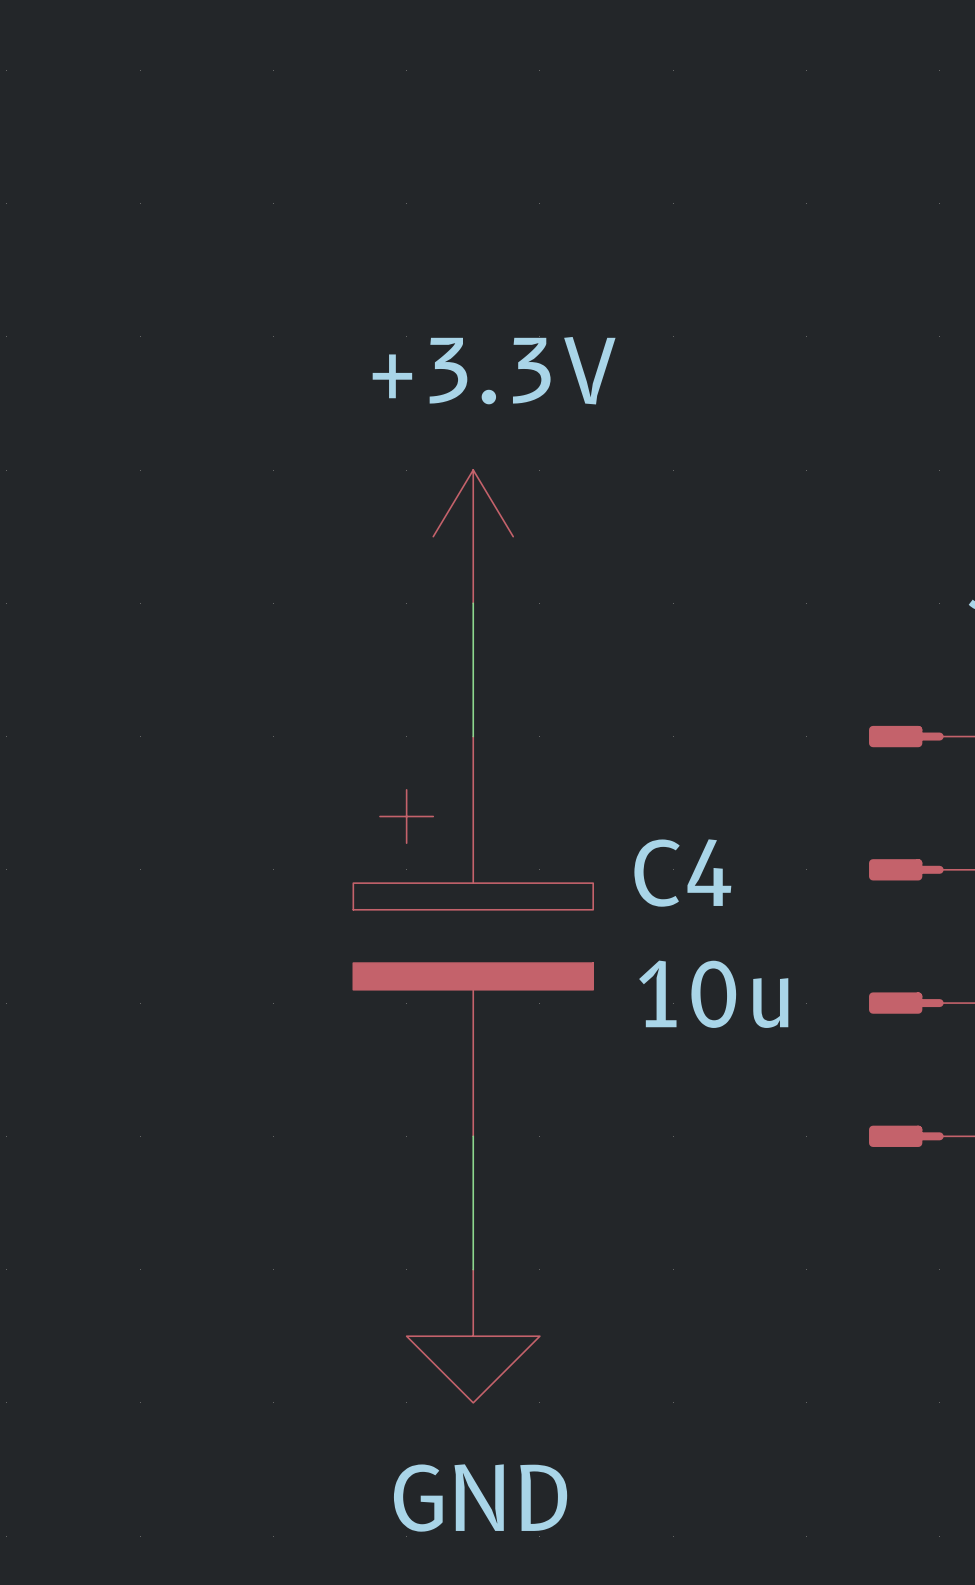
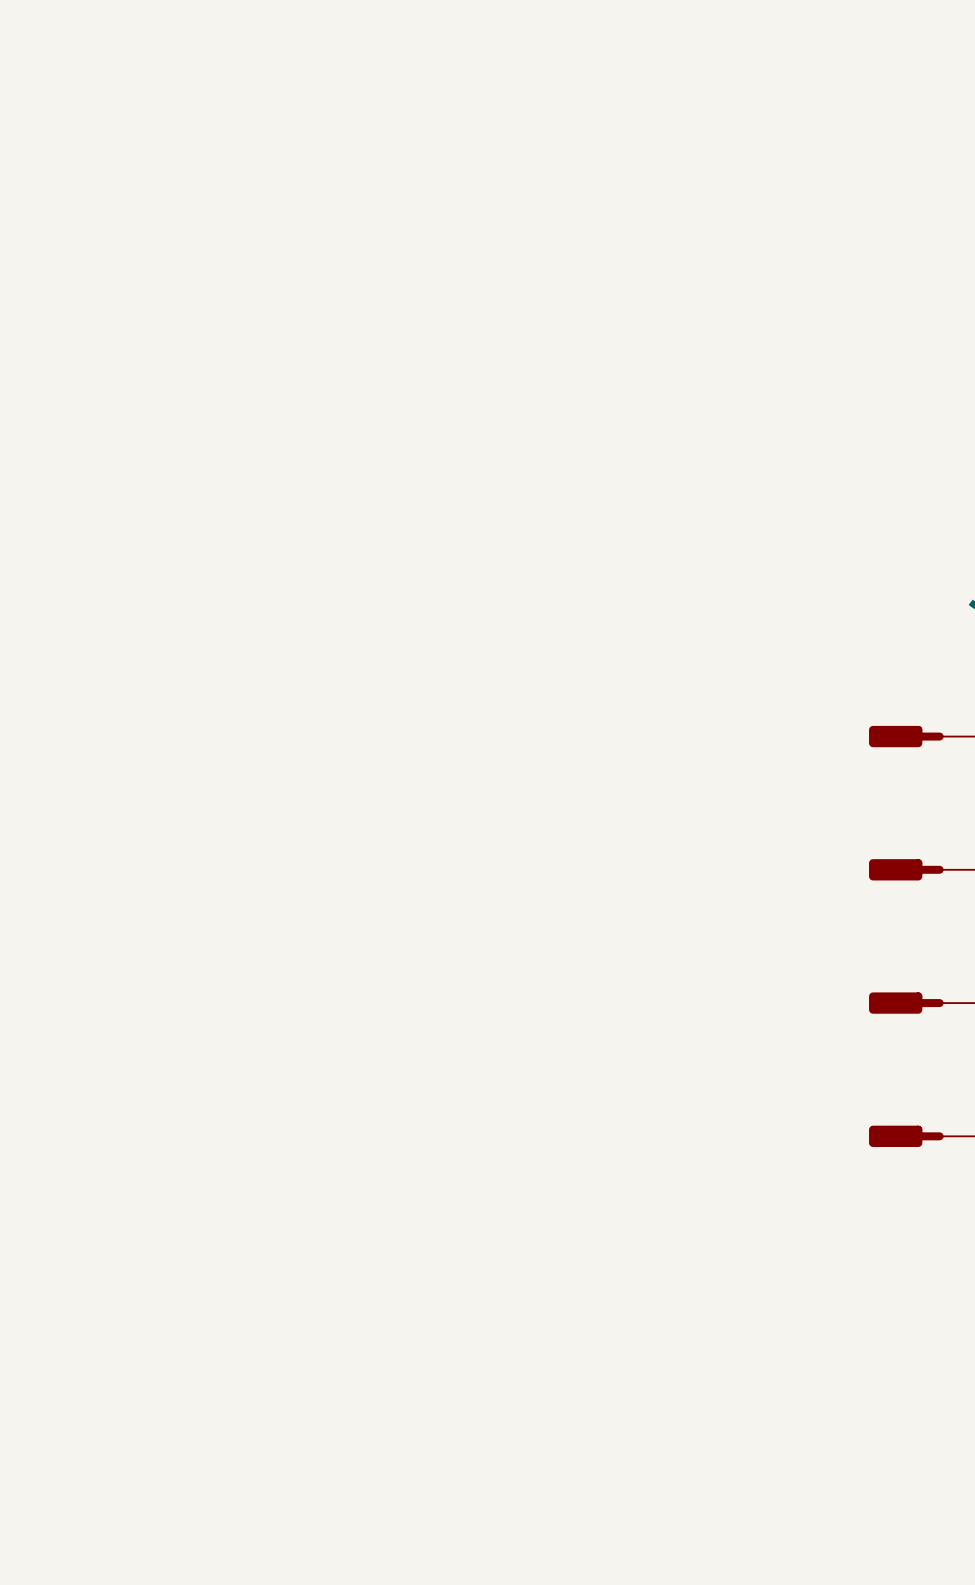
power symbol: +3.3V (473, 536) -> none
wire: (473, 603) (473, 736) -> none
C4: 10u (473, 936) -> none
wire: (473, 1136) (473, 1269) -> none
power symbol: GND (473, 1336) -> none

